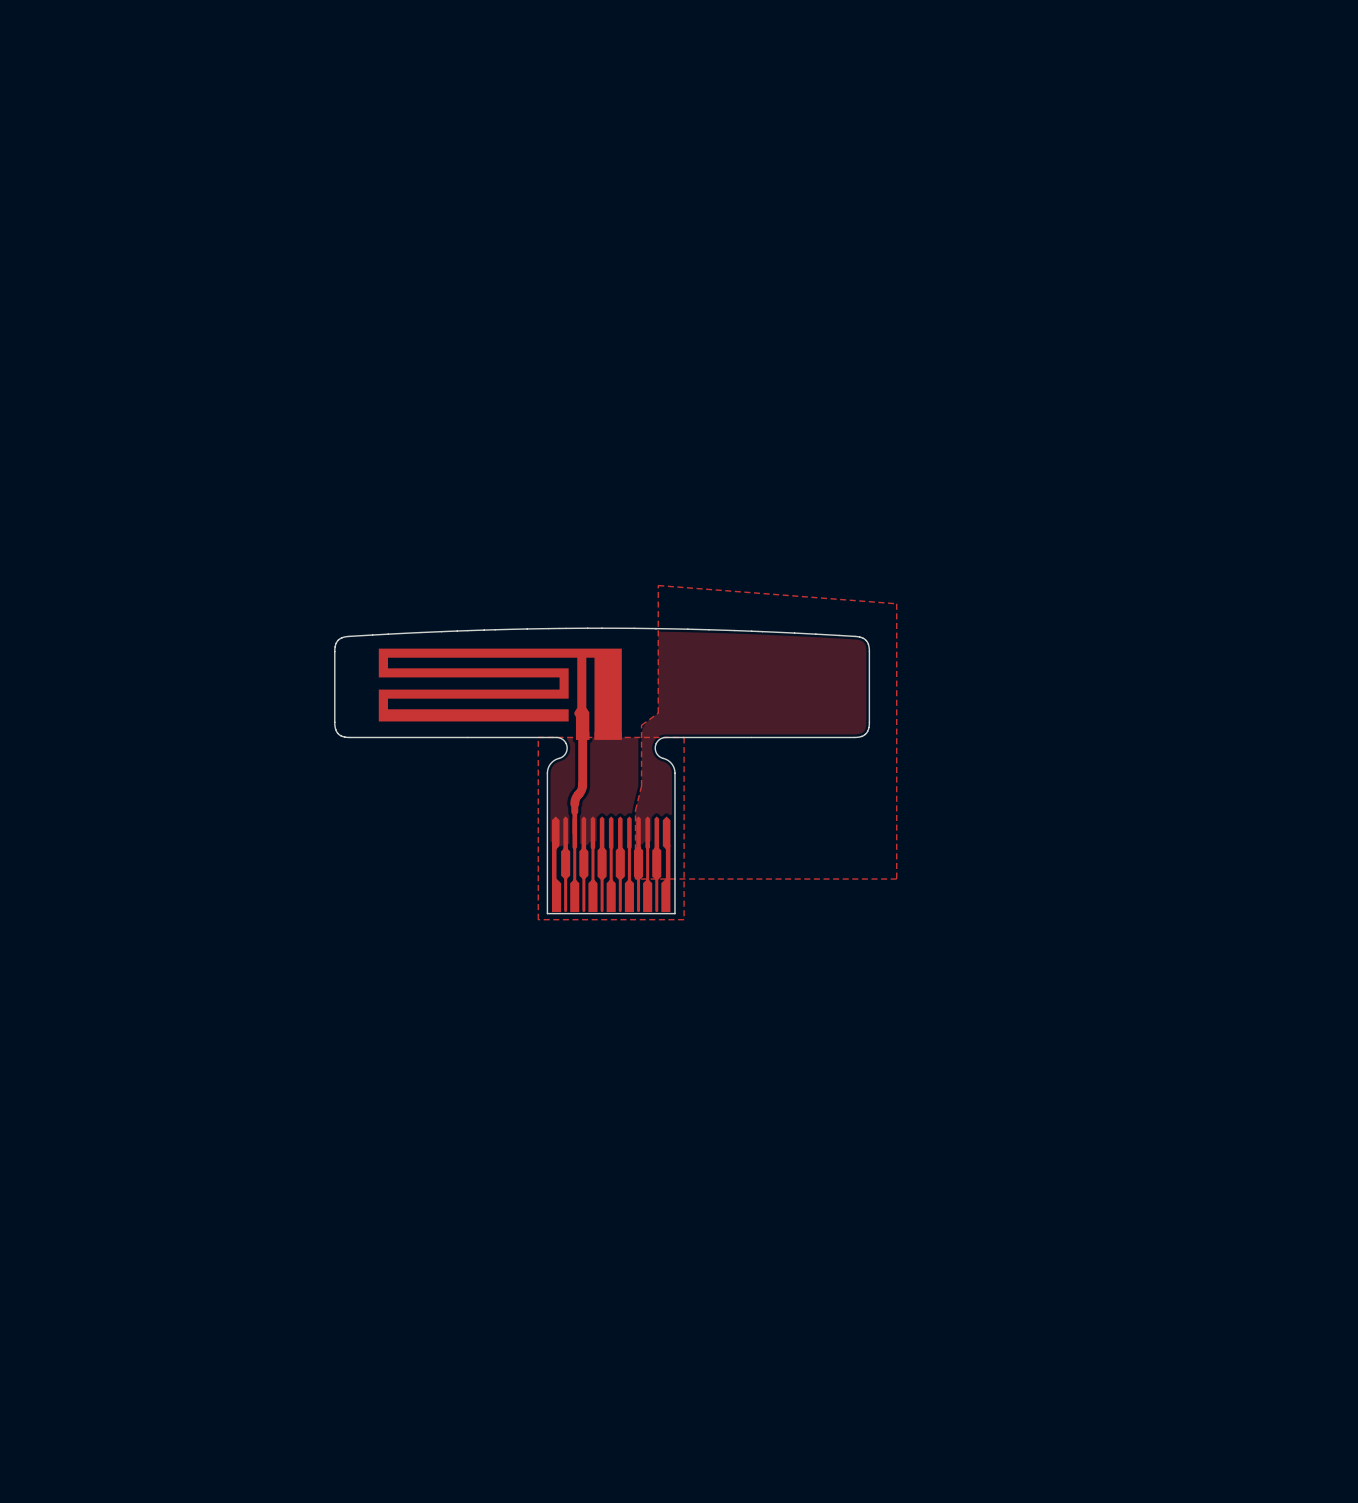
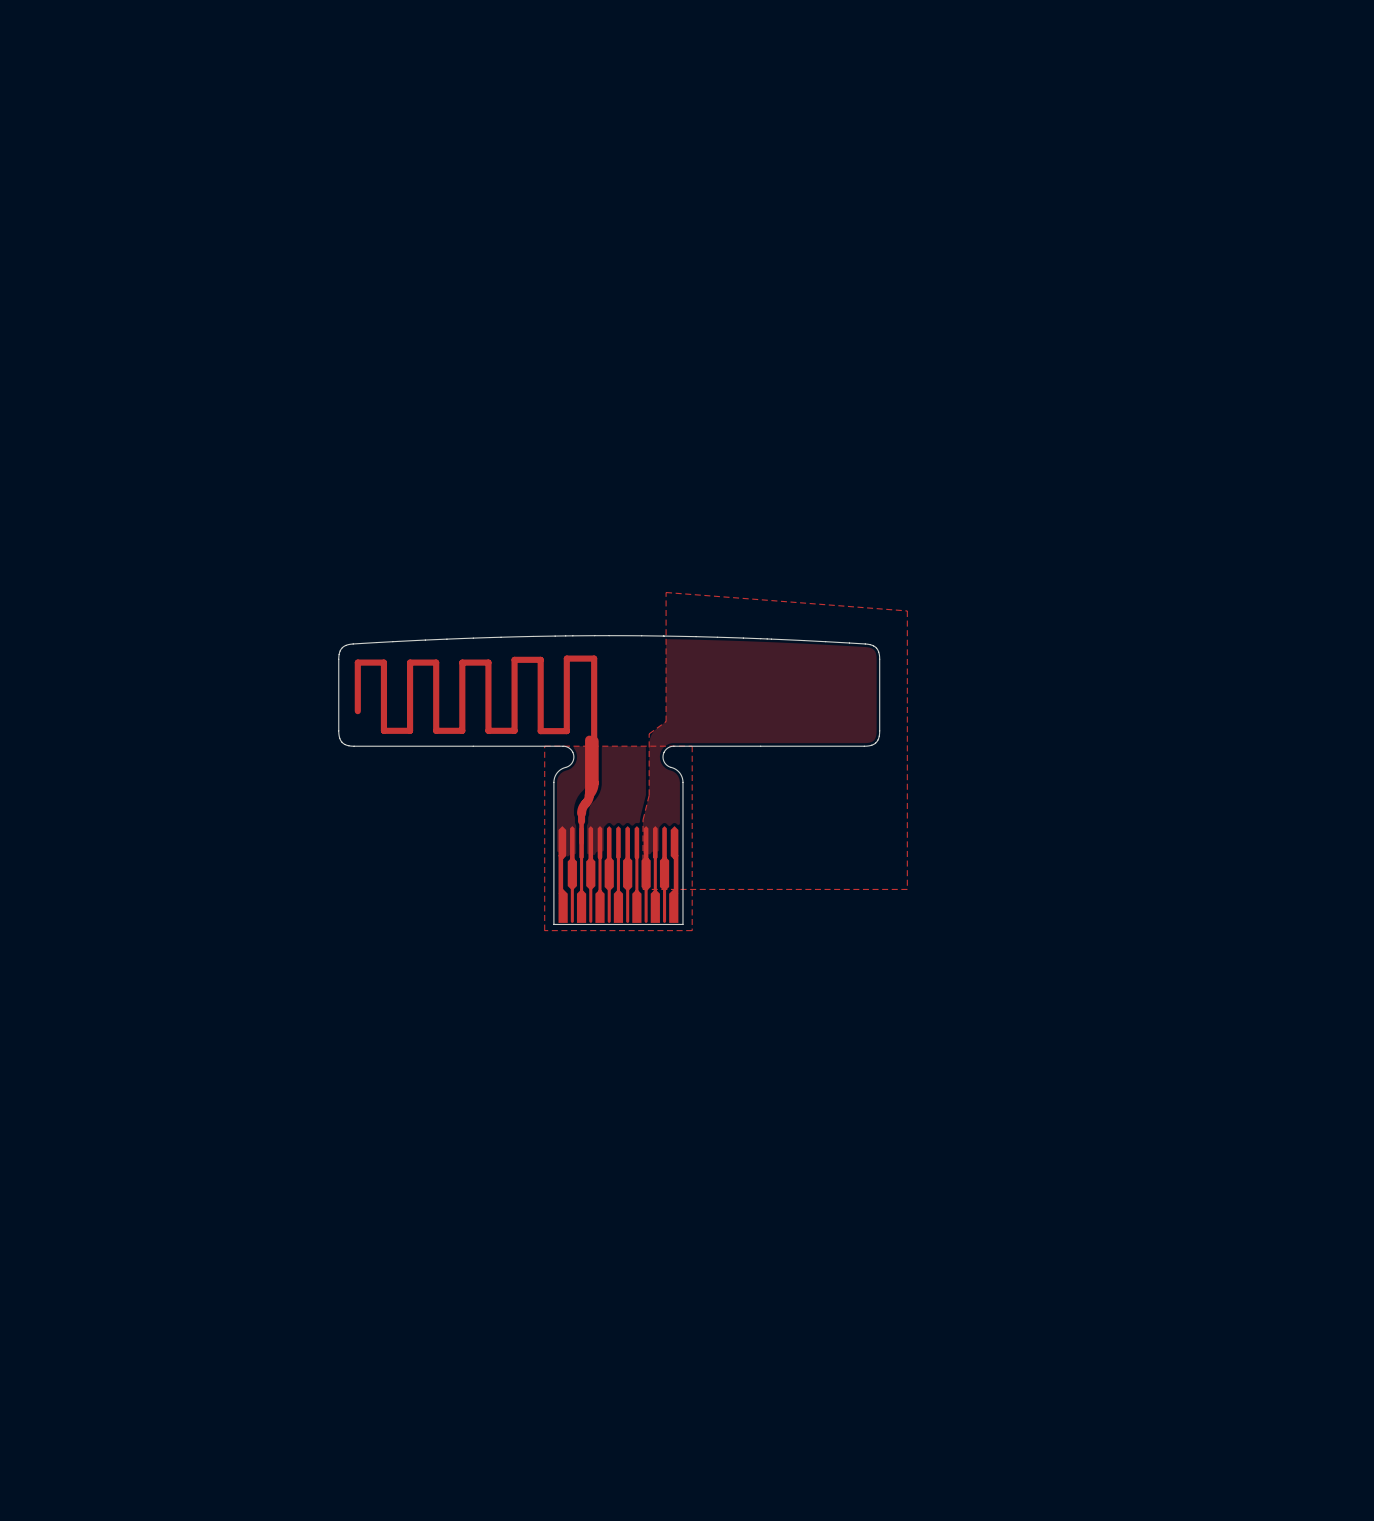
part: (500, 694) -> none
track: none -> (357, 711) (357, 662) (383, 662) (383, 730) (410, 730) (410, 662) (436, 662) (436, 730) (462, 730) (462, 662) (488, 662) (488, 730) (514, 730) (514, 659) (540, 659) (540, 731) (566, 731) (566, 658) (594, 658) (594, 782) (589, 795)

